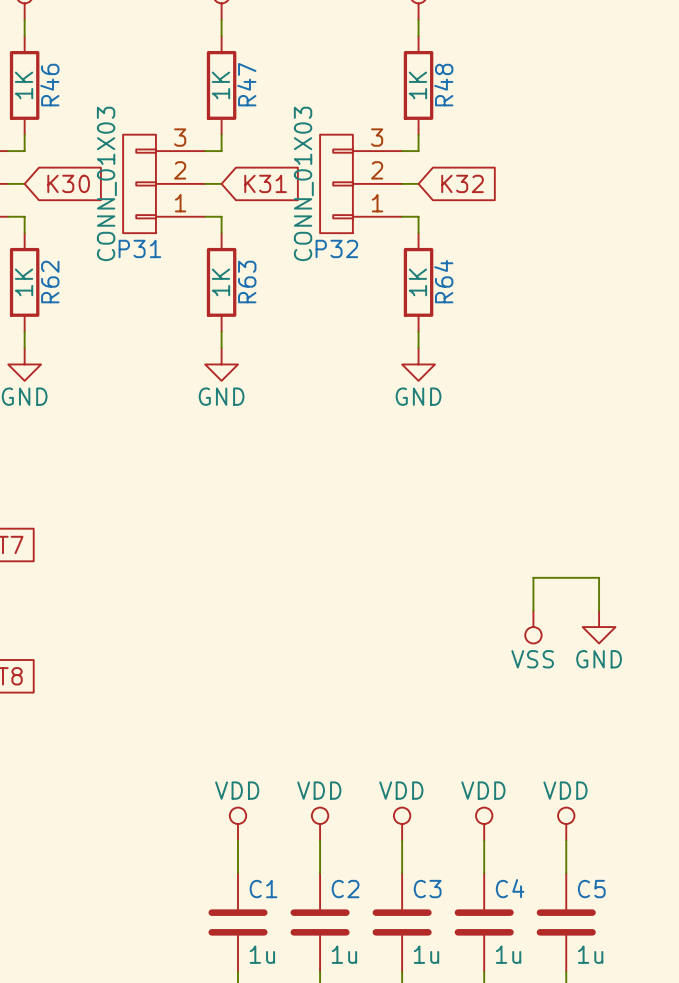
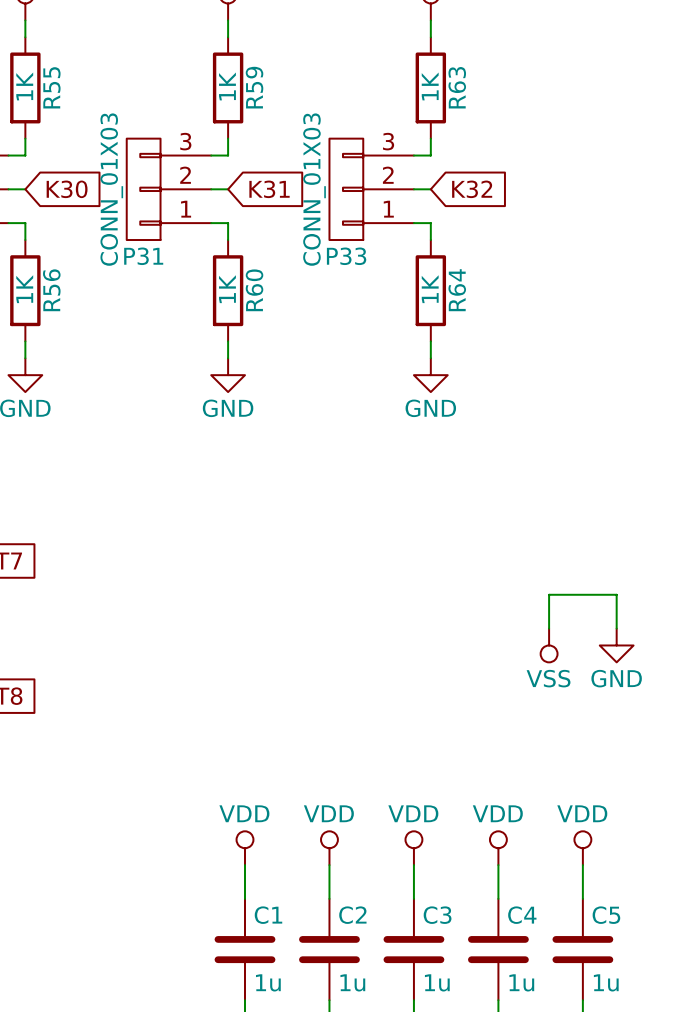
R47 name: R47 (246, 84) -> R59 (254, 87)
R46 name: R46 (49, 85) -> R55 (51, 87)
R48 name: R48 (443, 85) -> R63 (457, 87)
P32 name: P32 (336, 248) -> P33 (346, 256)
R62 name: R62 (50, 282) -> R56 (51, 290)
R63 name: R63 (247, 282) -> R60 (254, 290)

